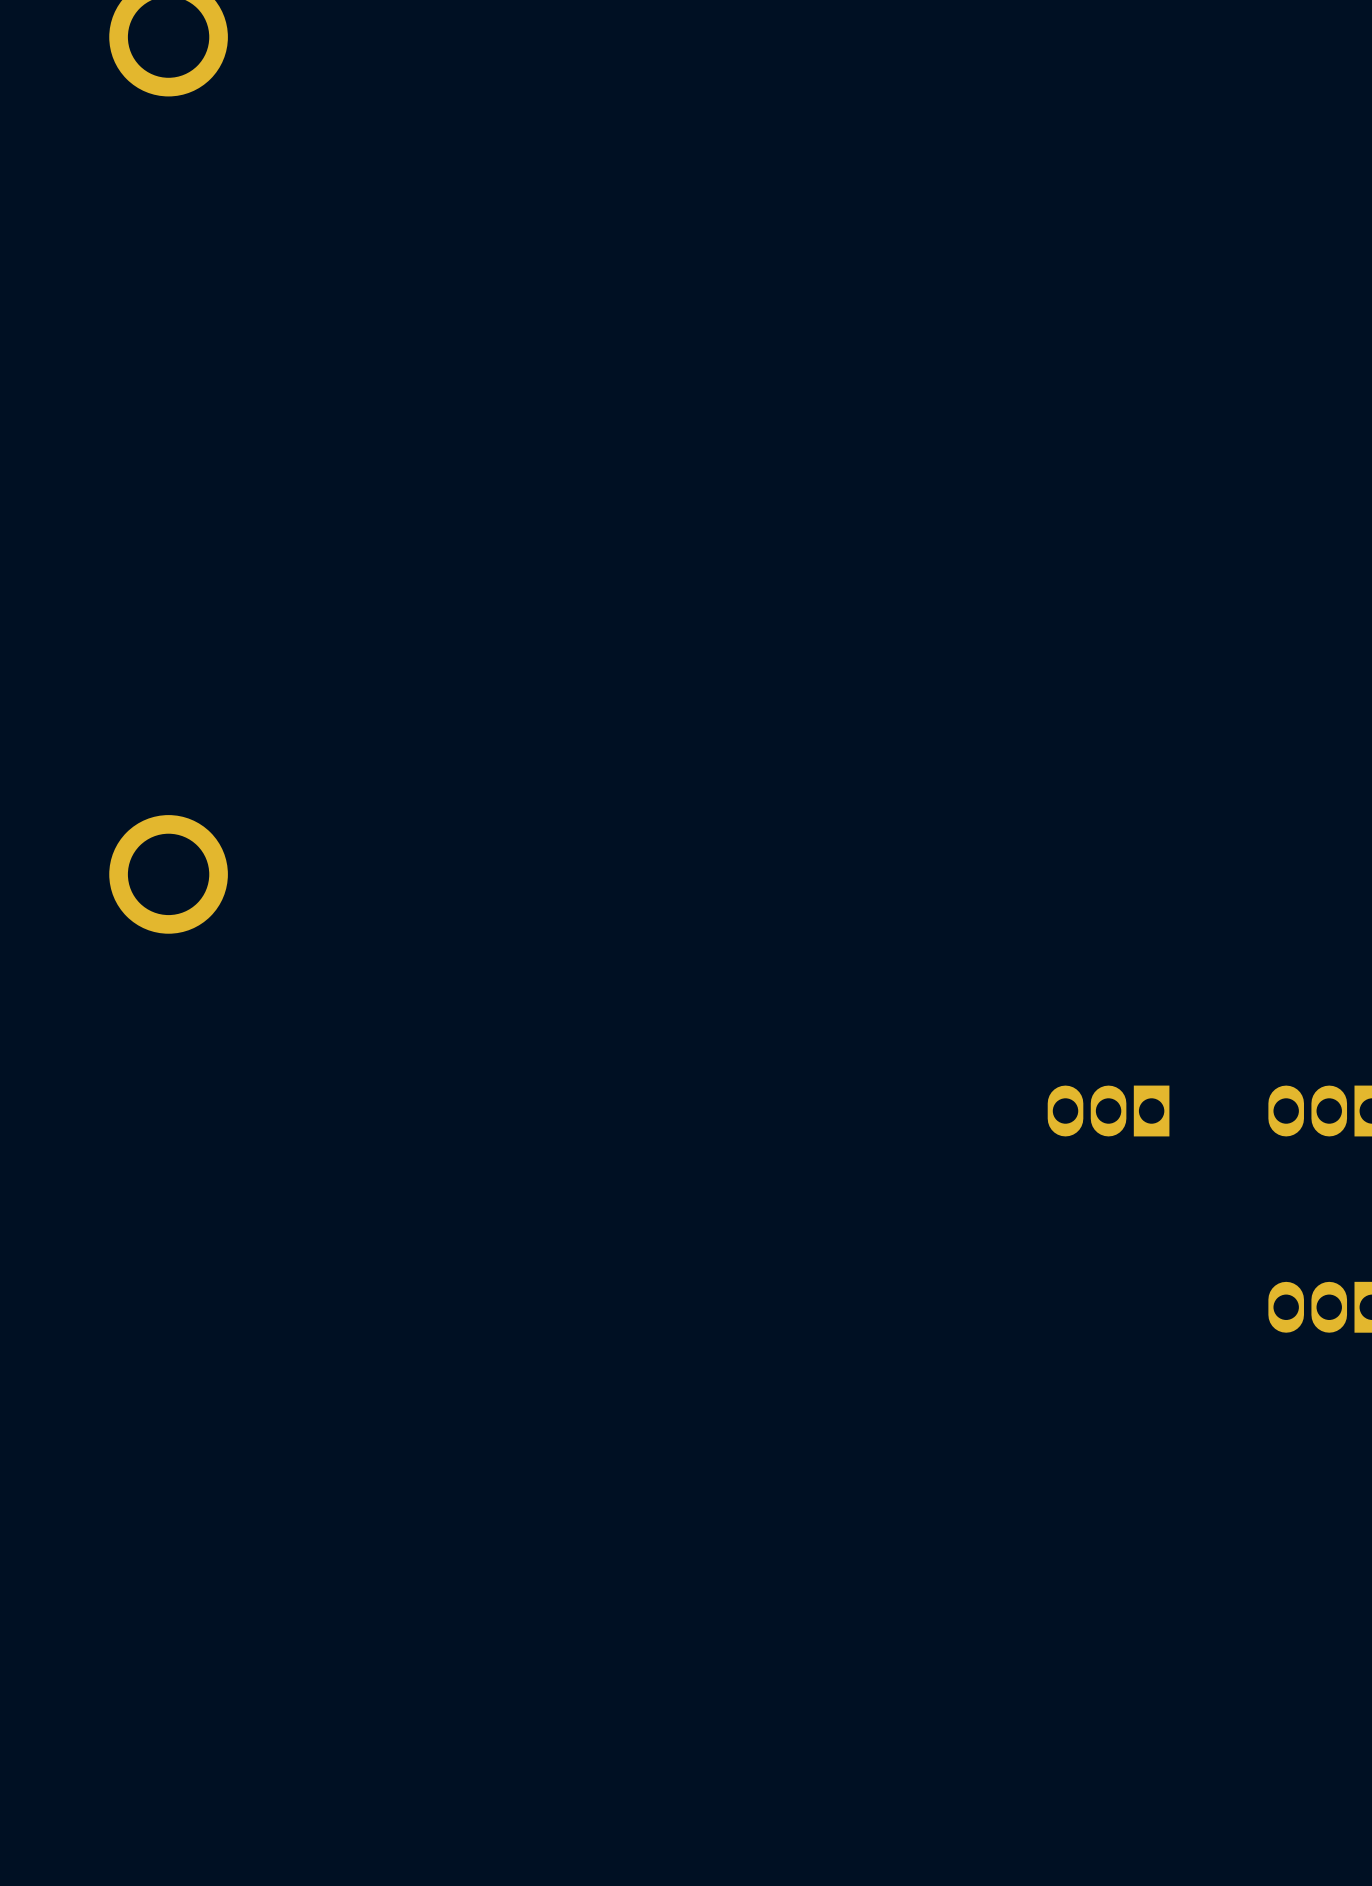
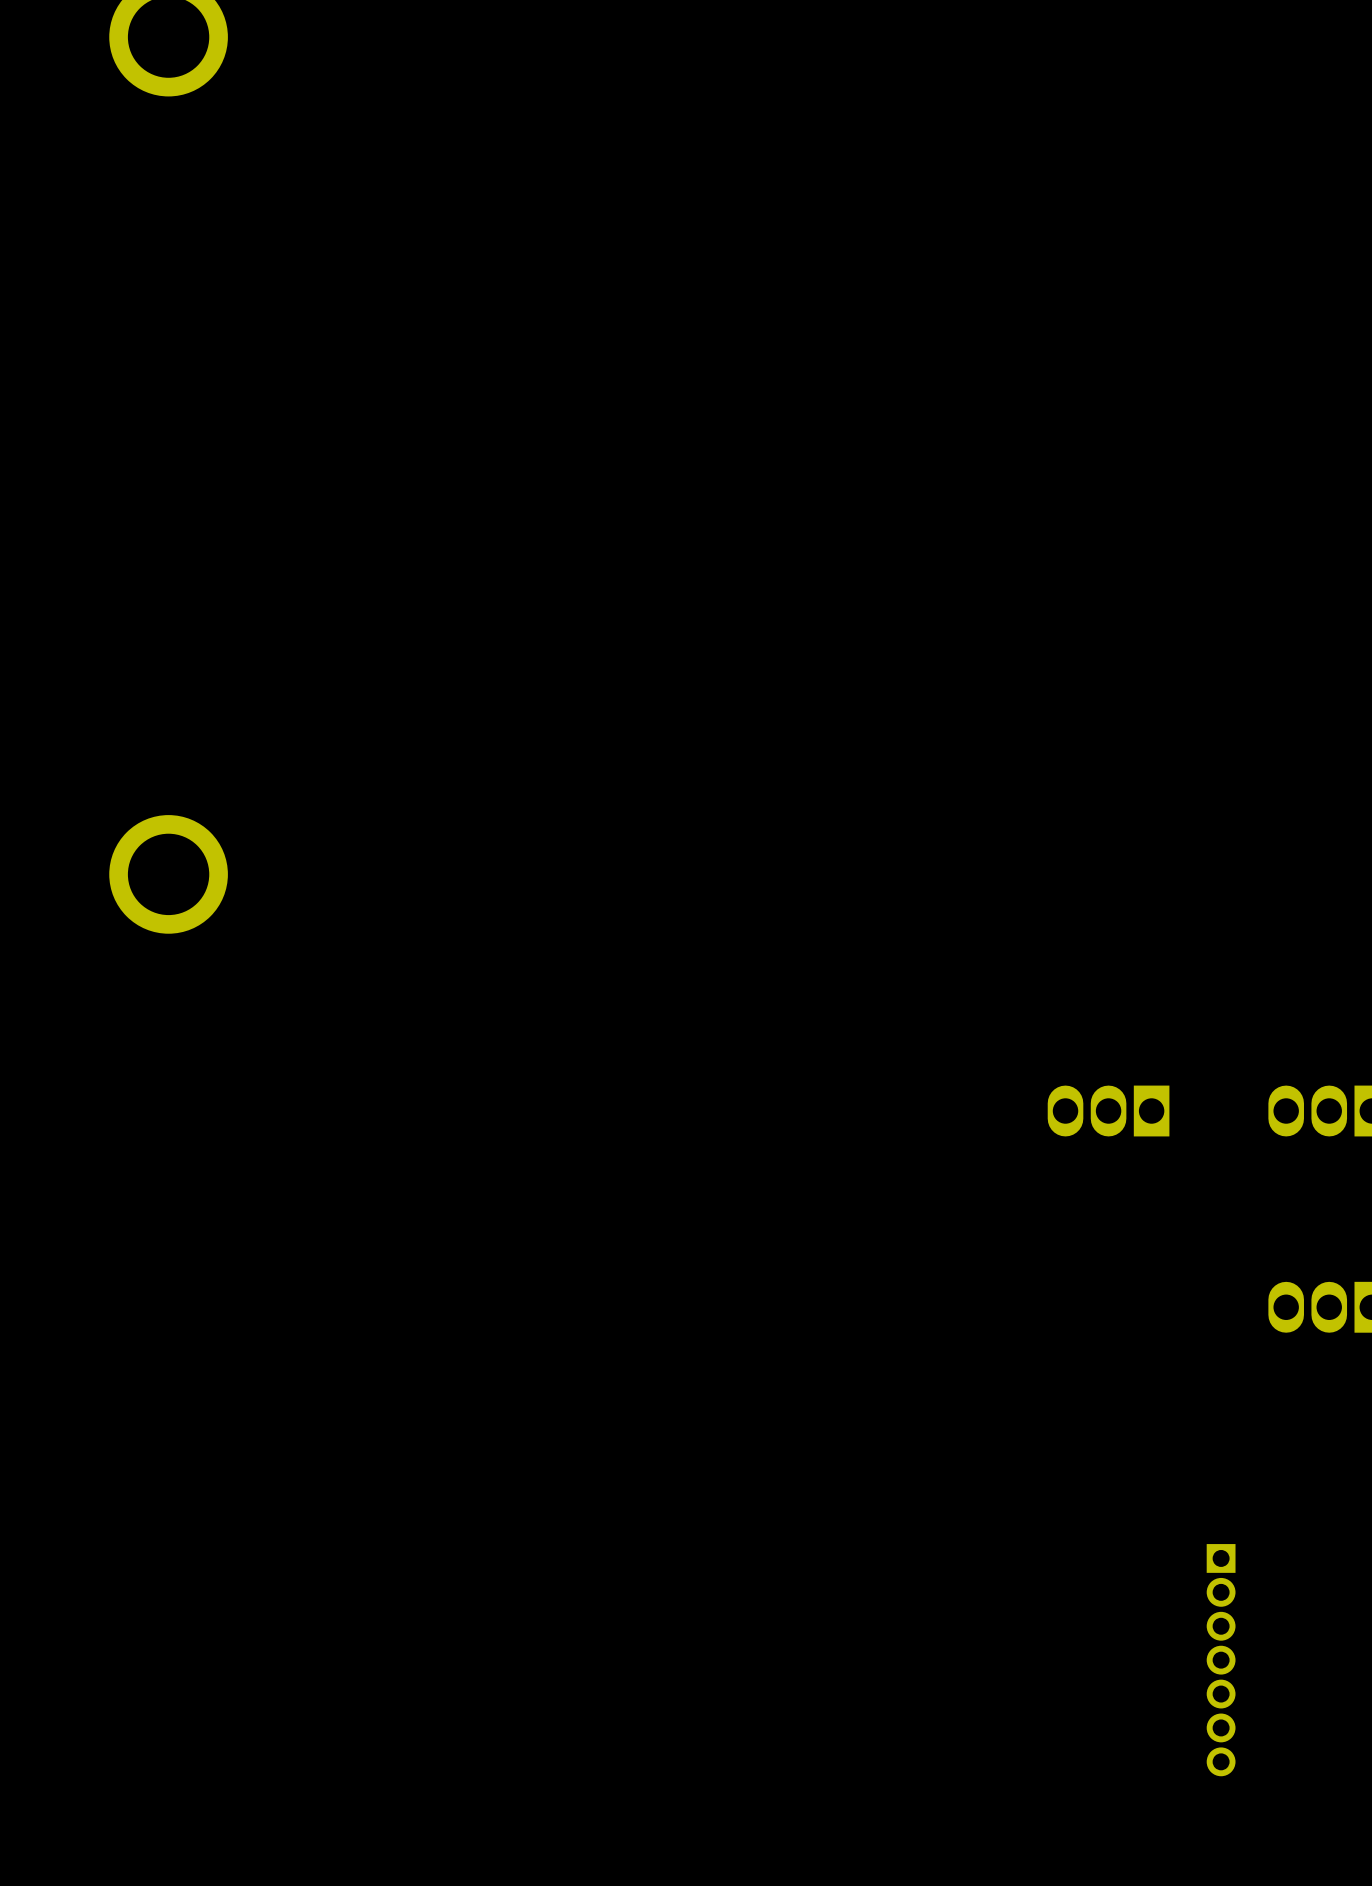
part: none -> (1221, 1660)

